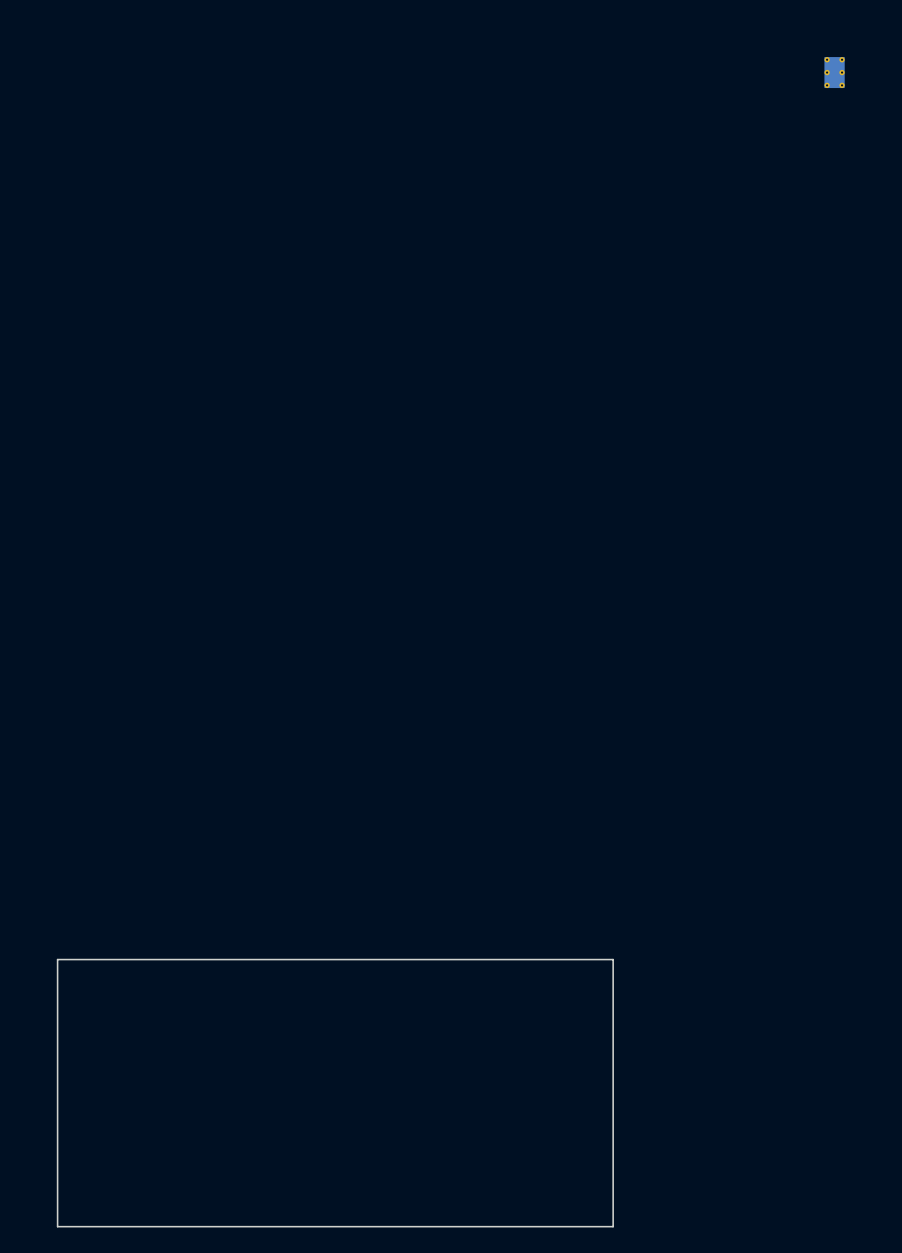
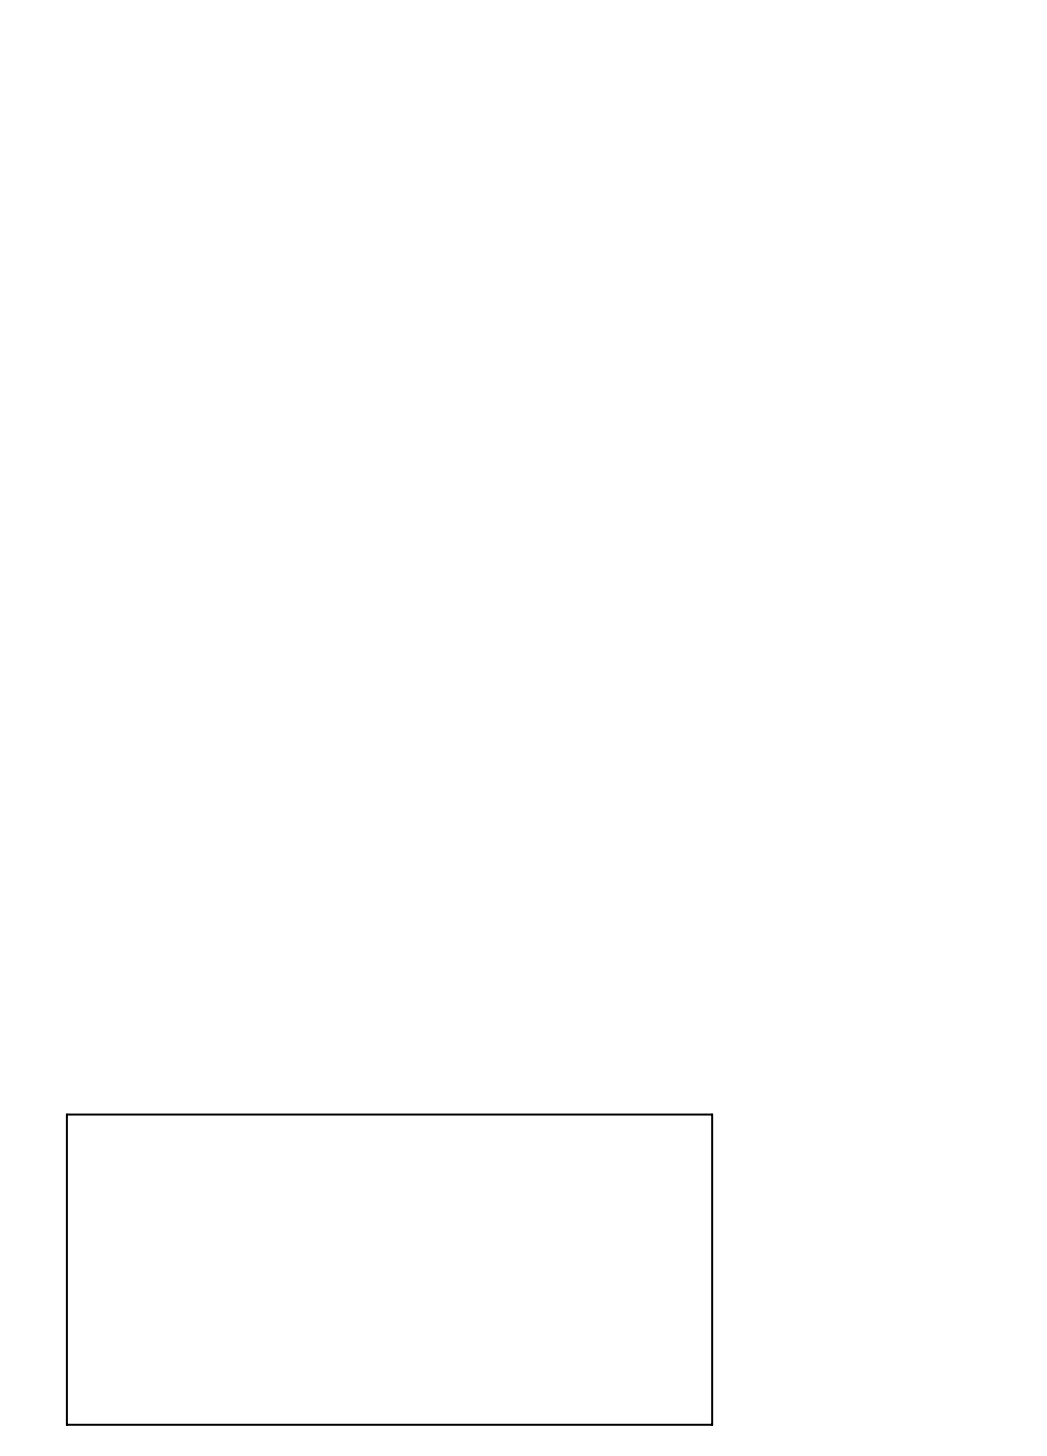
part: (834, 72) -> none

